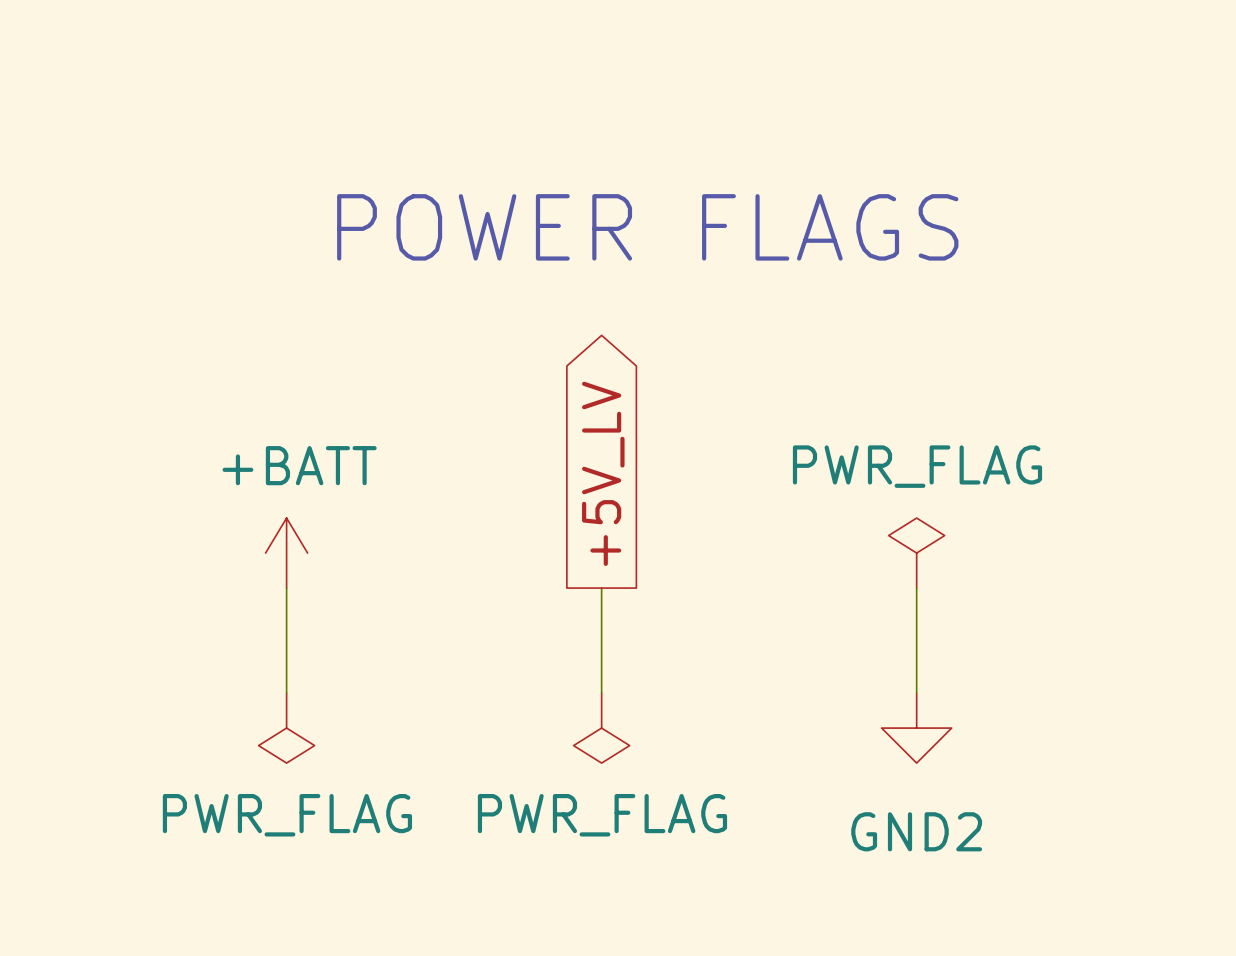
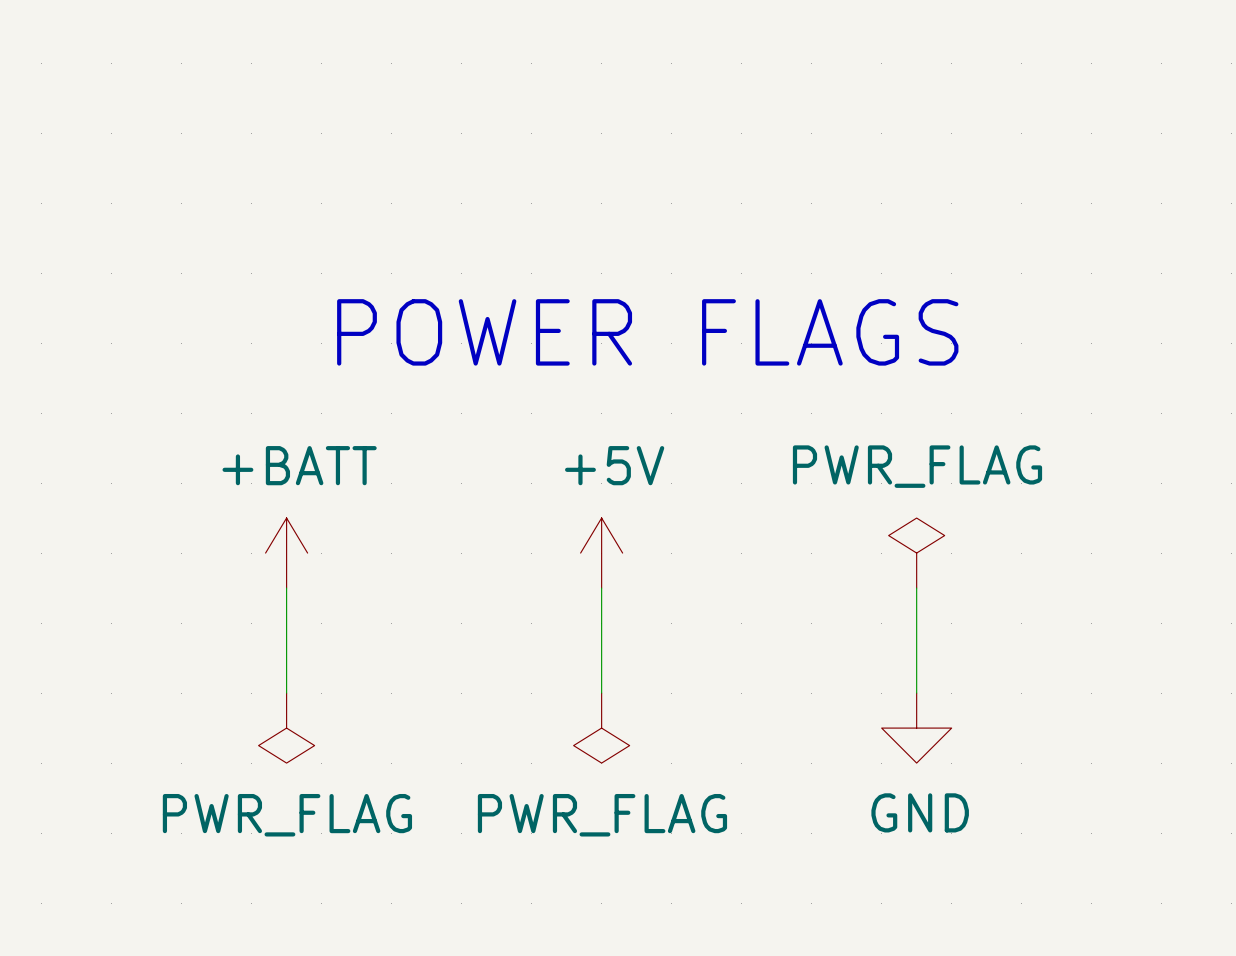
text position: POWER FLAGS (647, 227) -> POWER FLAGS (647, 332)
global label: +5V_LV (603, 473) -> none
power symbol: none -> +5V (601, 553)
power symbol: GND2 (916, 728) -> GND (916, 728)

